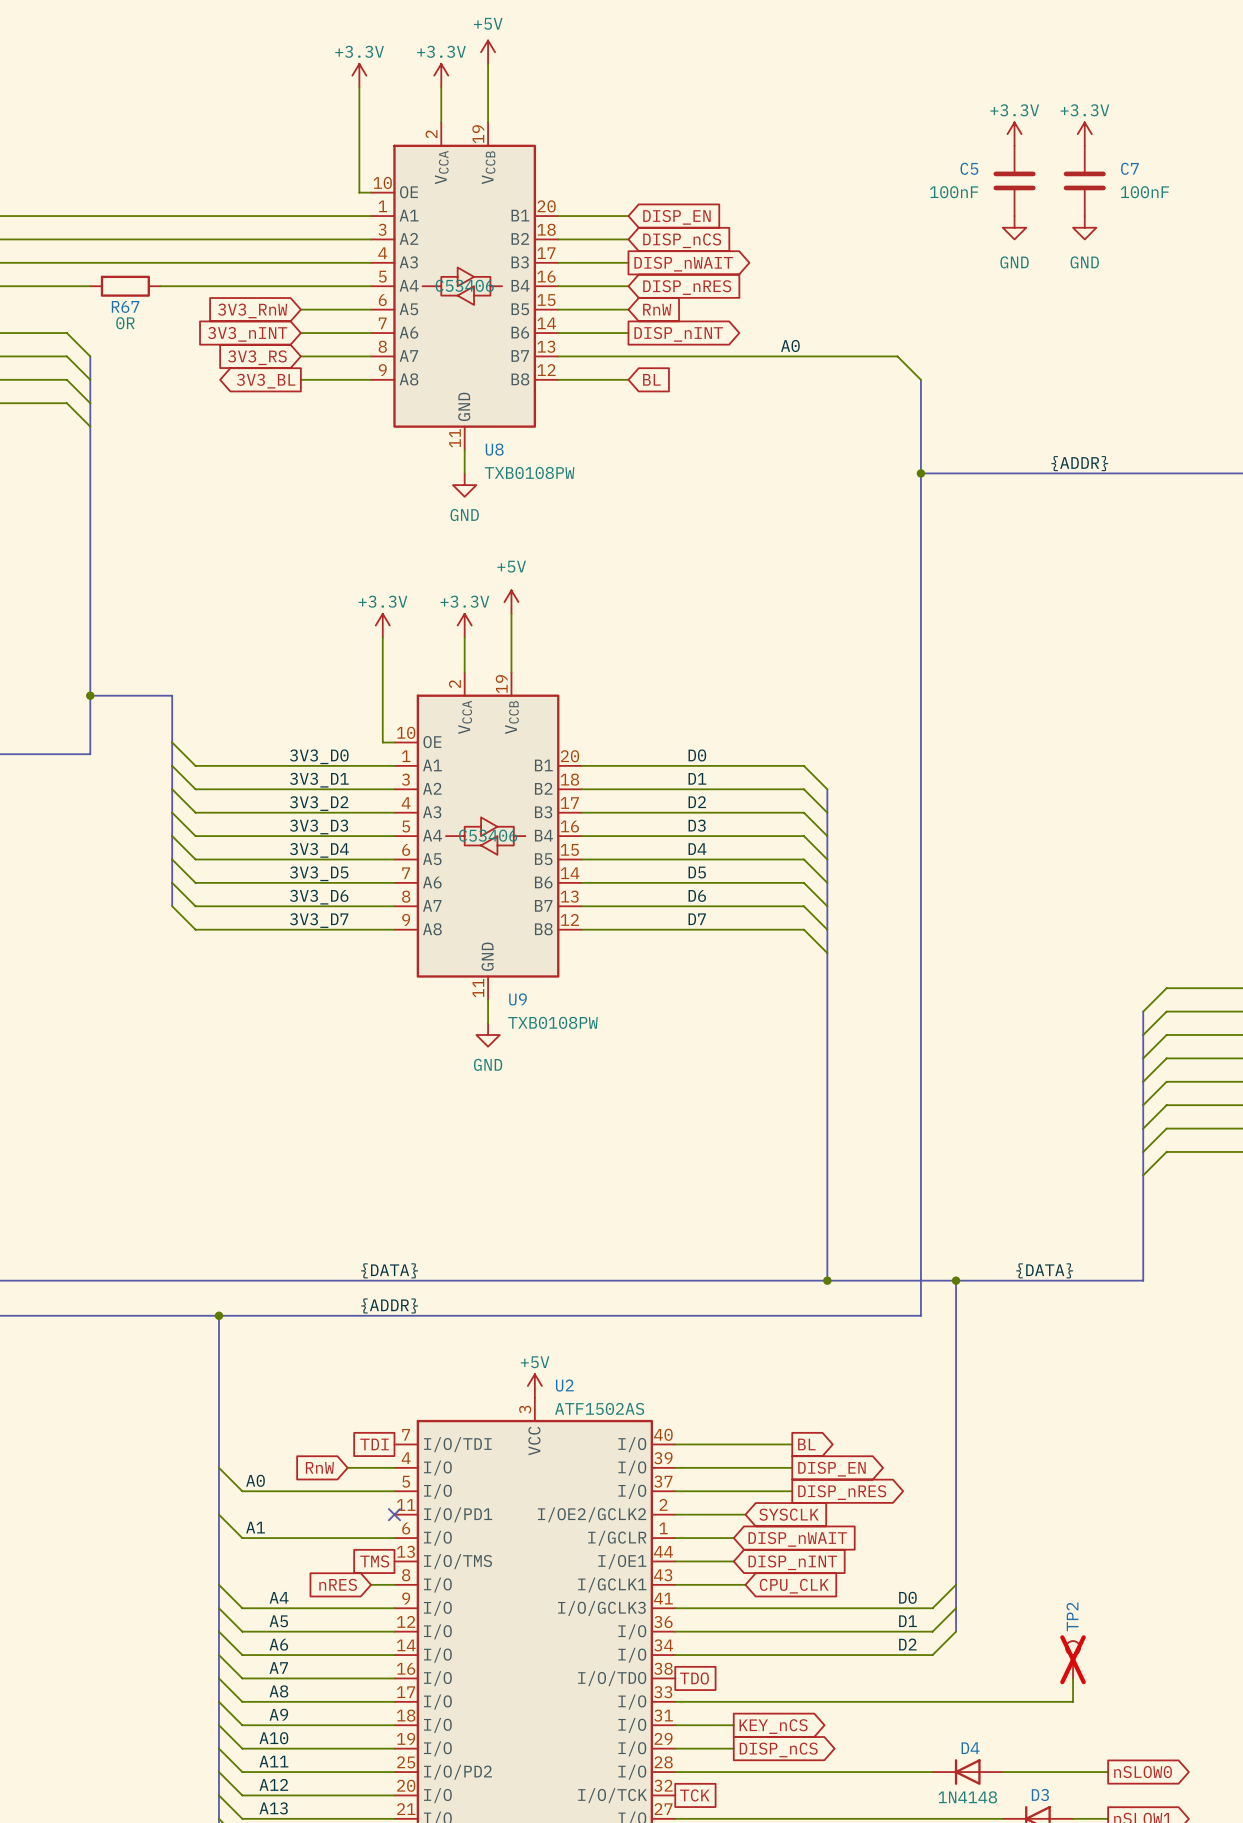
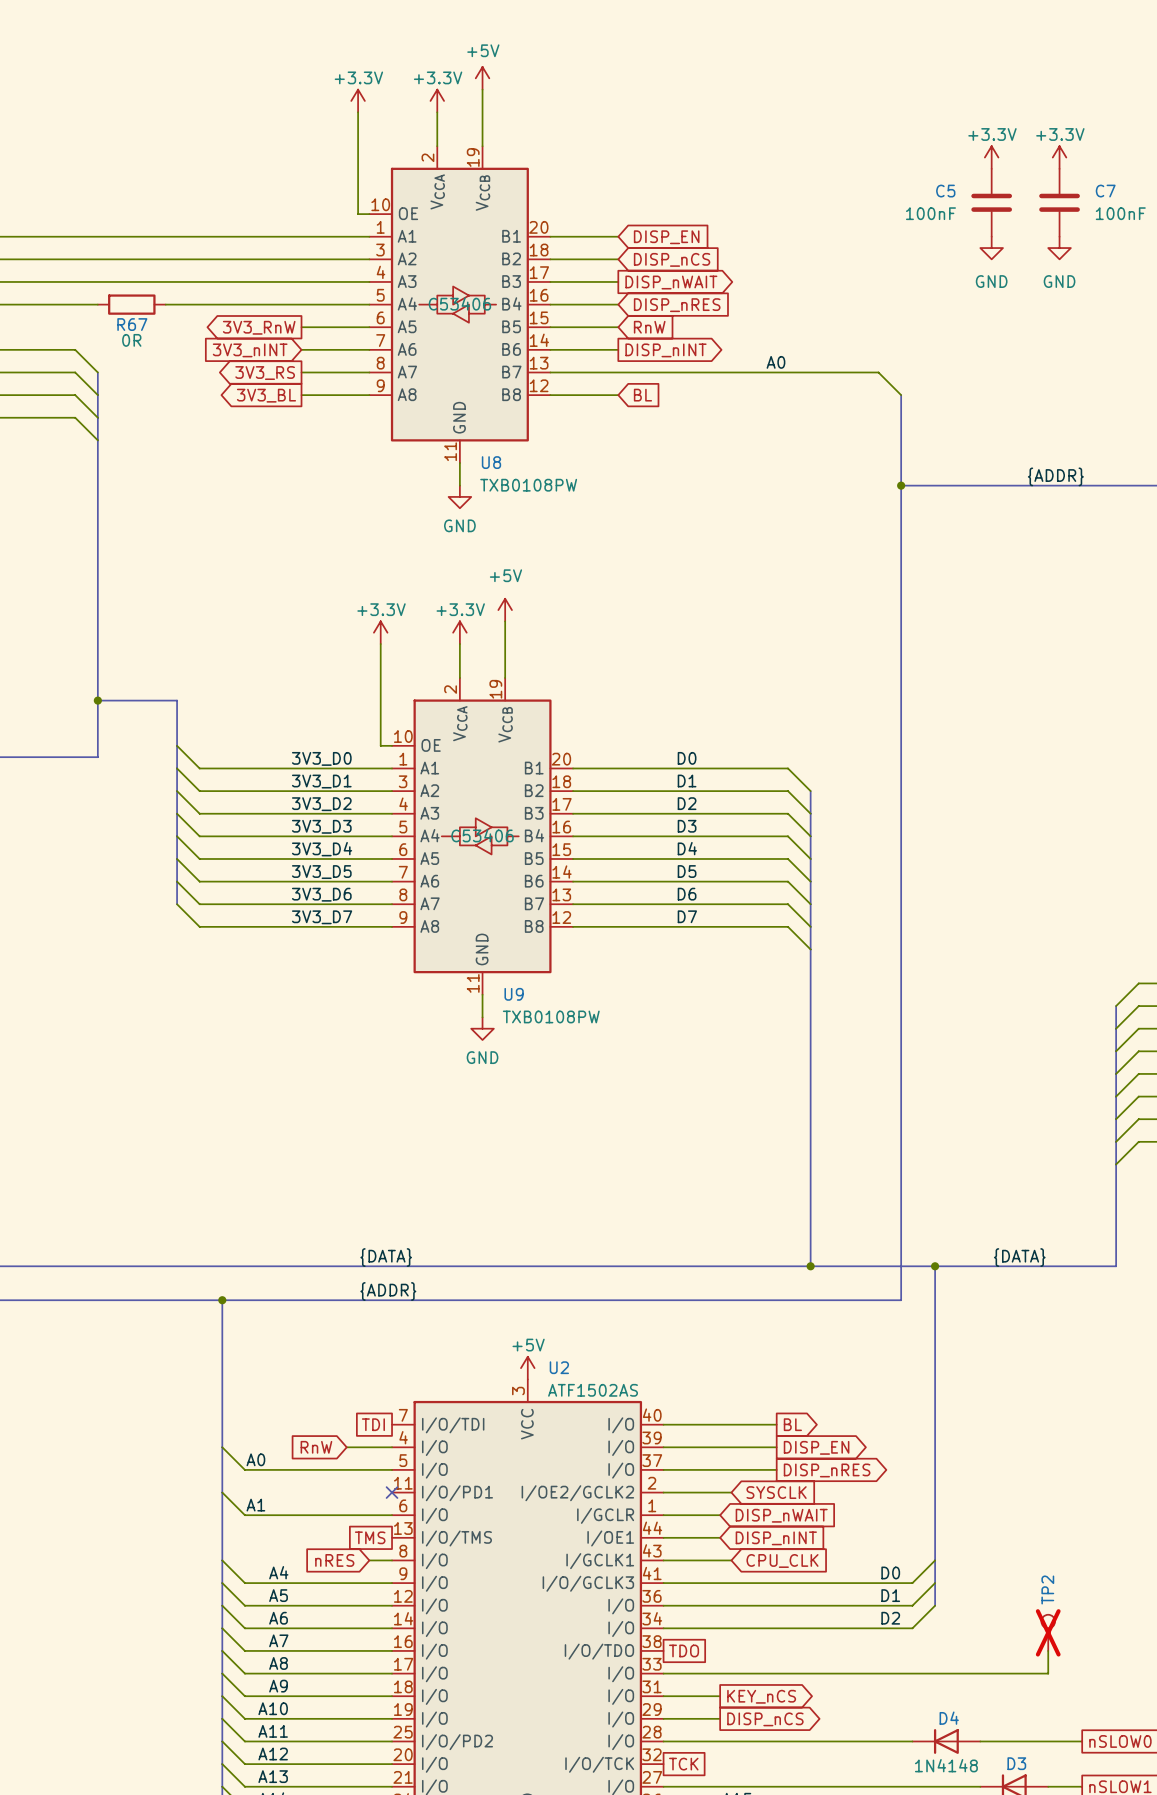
global label shape: input (252, 310) -> output (259, 327)
global label shape: input (257, 357) -> output (265, 373)

